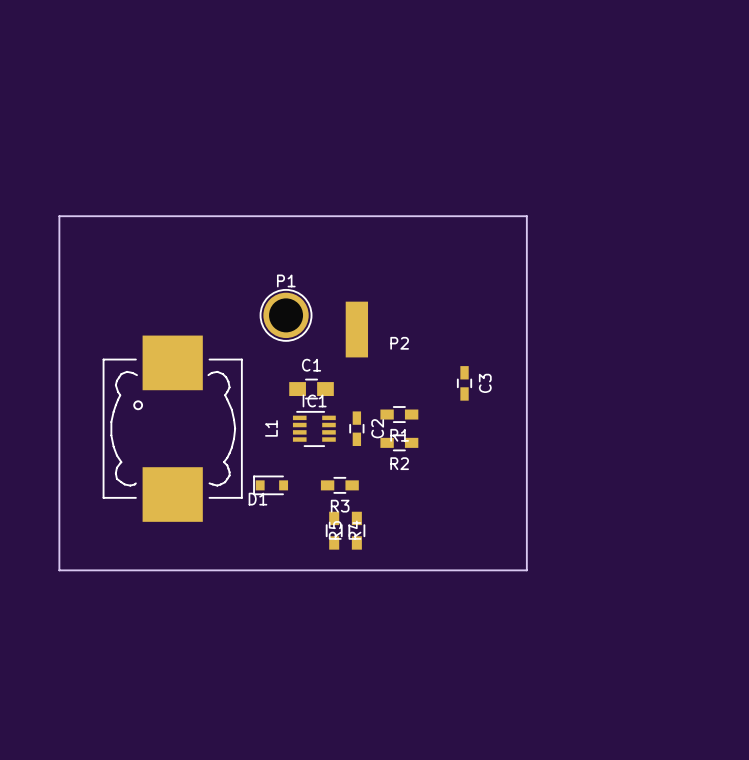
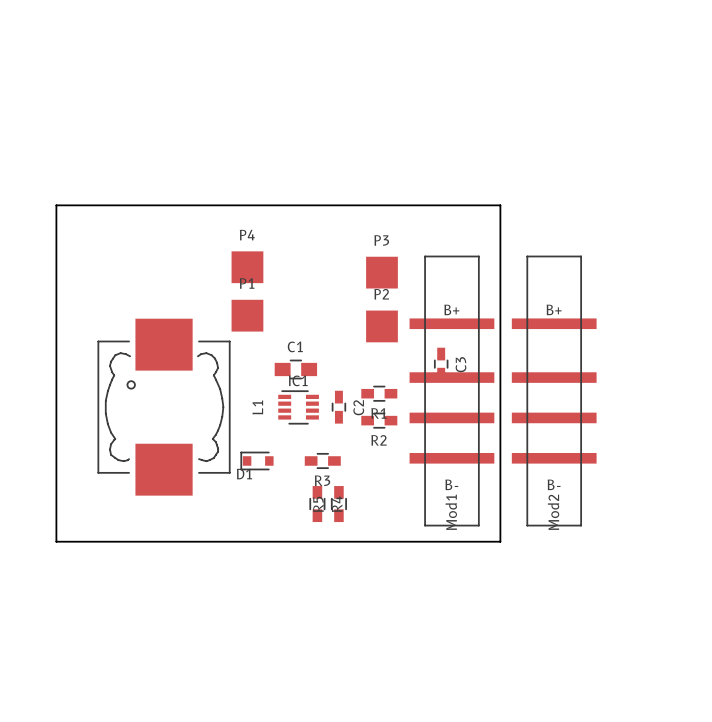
P4: none -> (247, 267)
P3: none -> (381, 272)
P1 footprint: [259, 289, 313, 342] -> [231, 299, 264, 332]
P2 footprint: [345, 301, 369, 358] -> [366, 310, 398, 343]
P2 name position: P2 (399, 343) -> P2 (381, 294)
Mod1: none -> (451, 391)
Mod2: none -> (554, 391)

